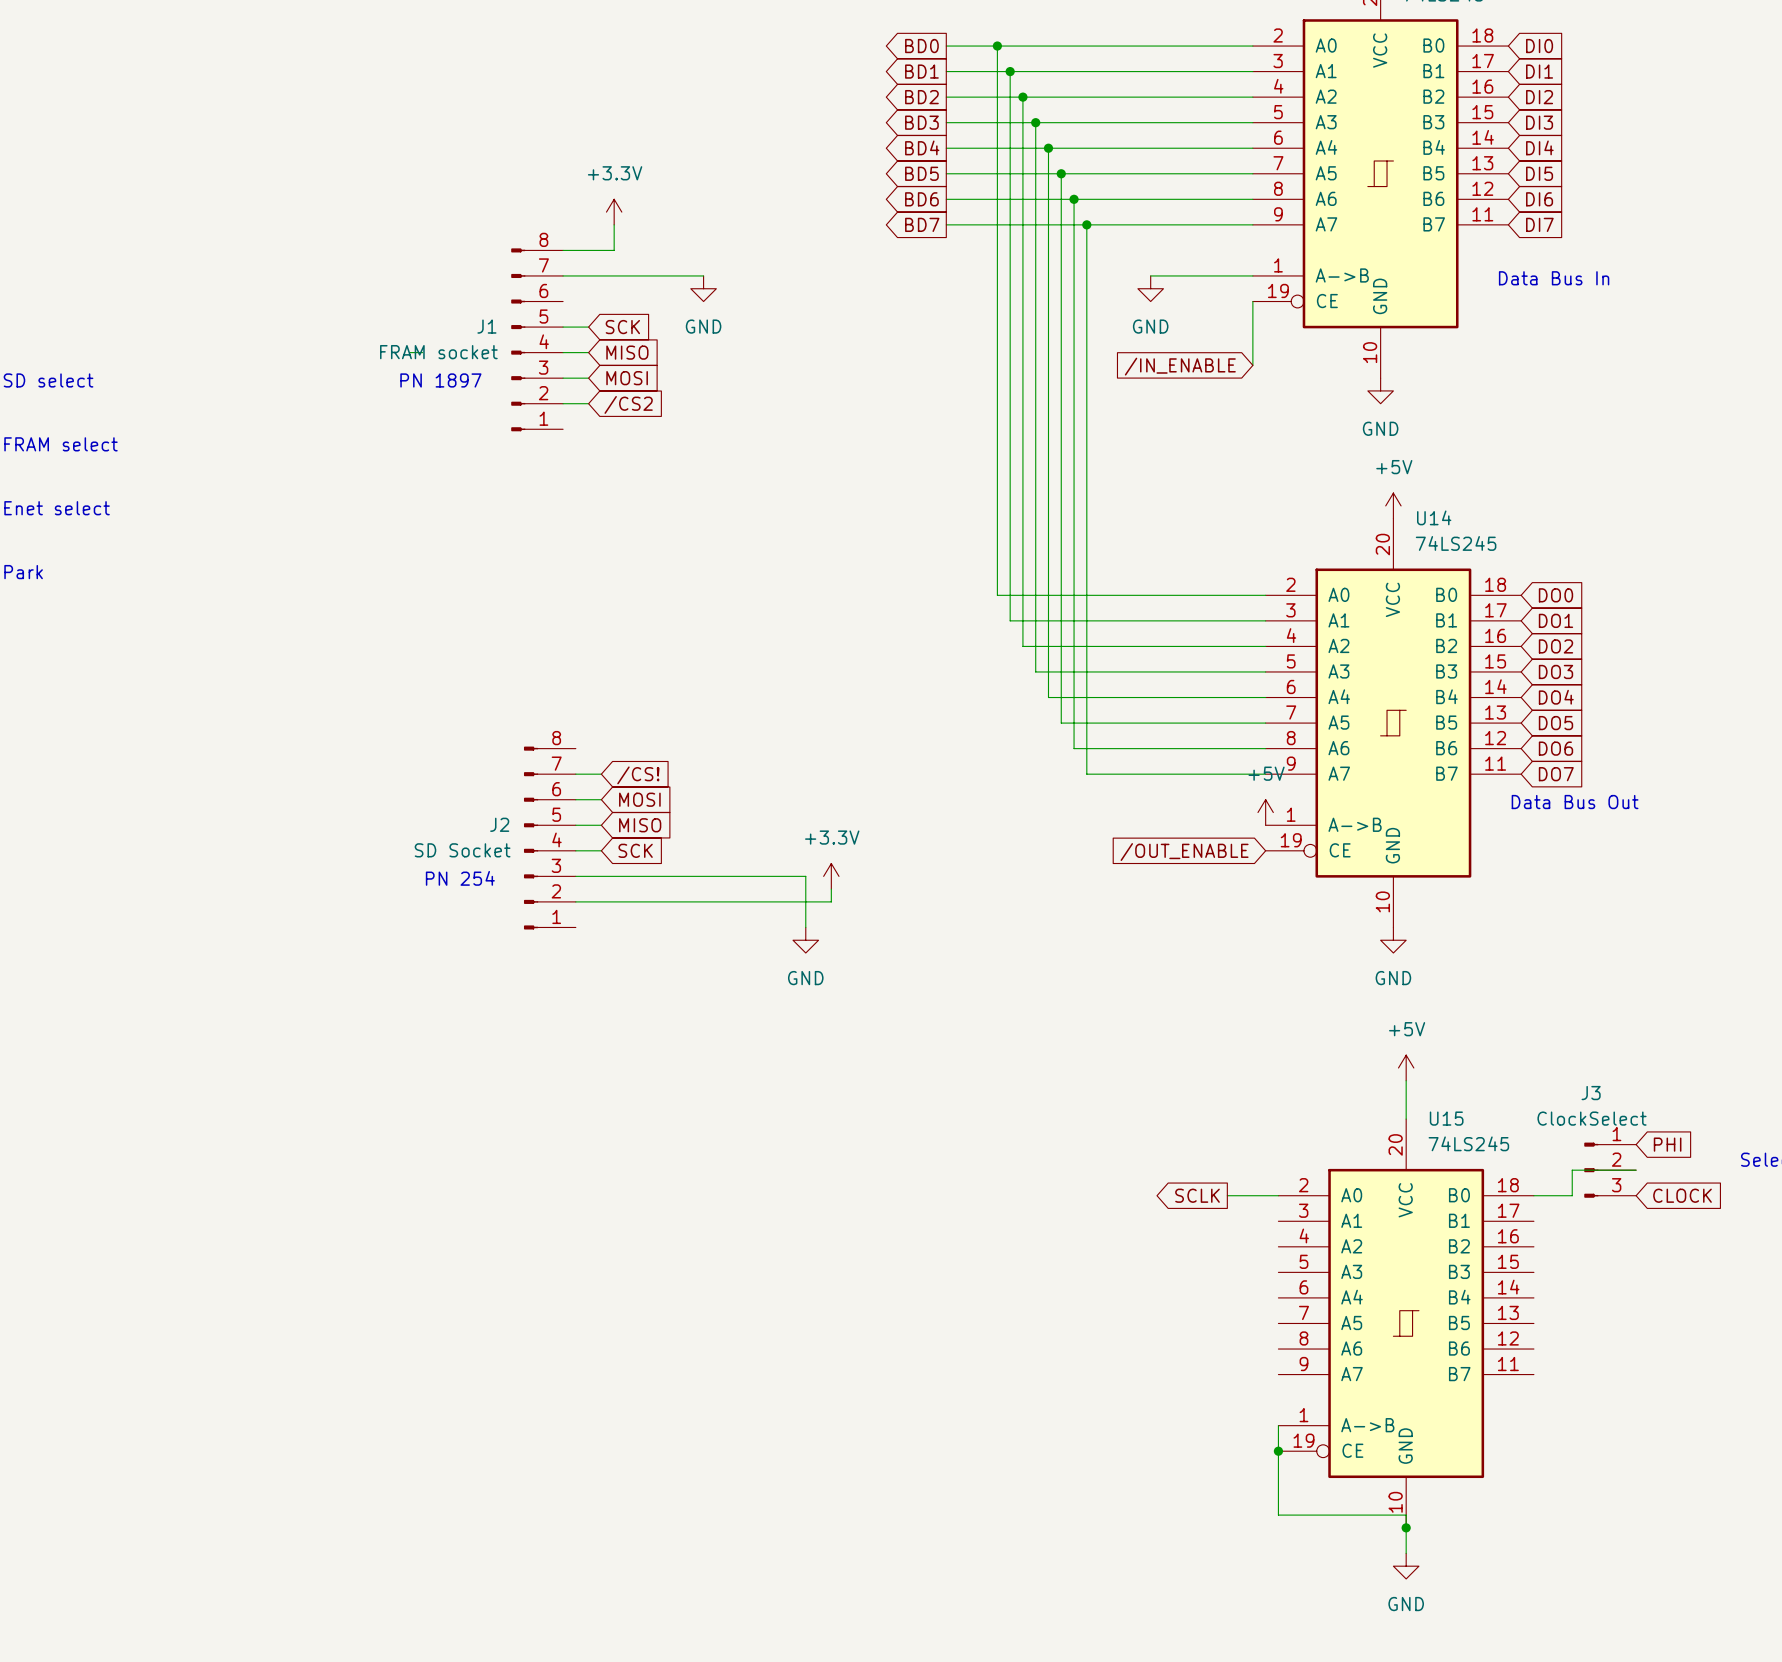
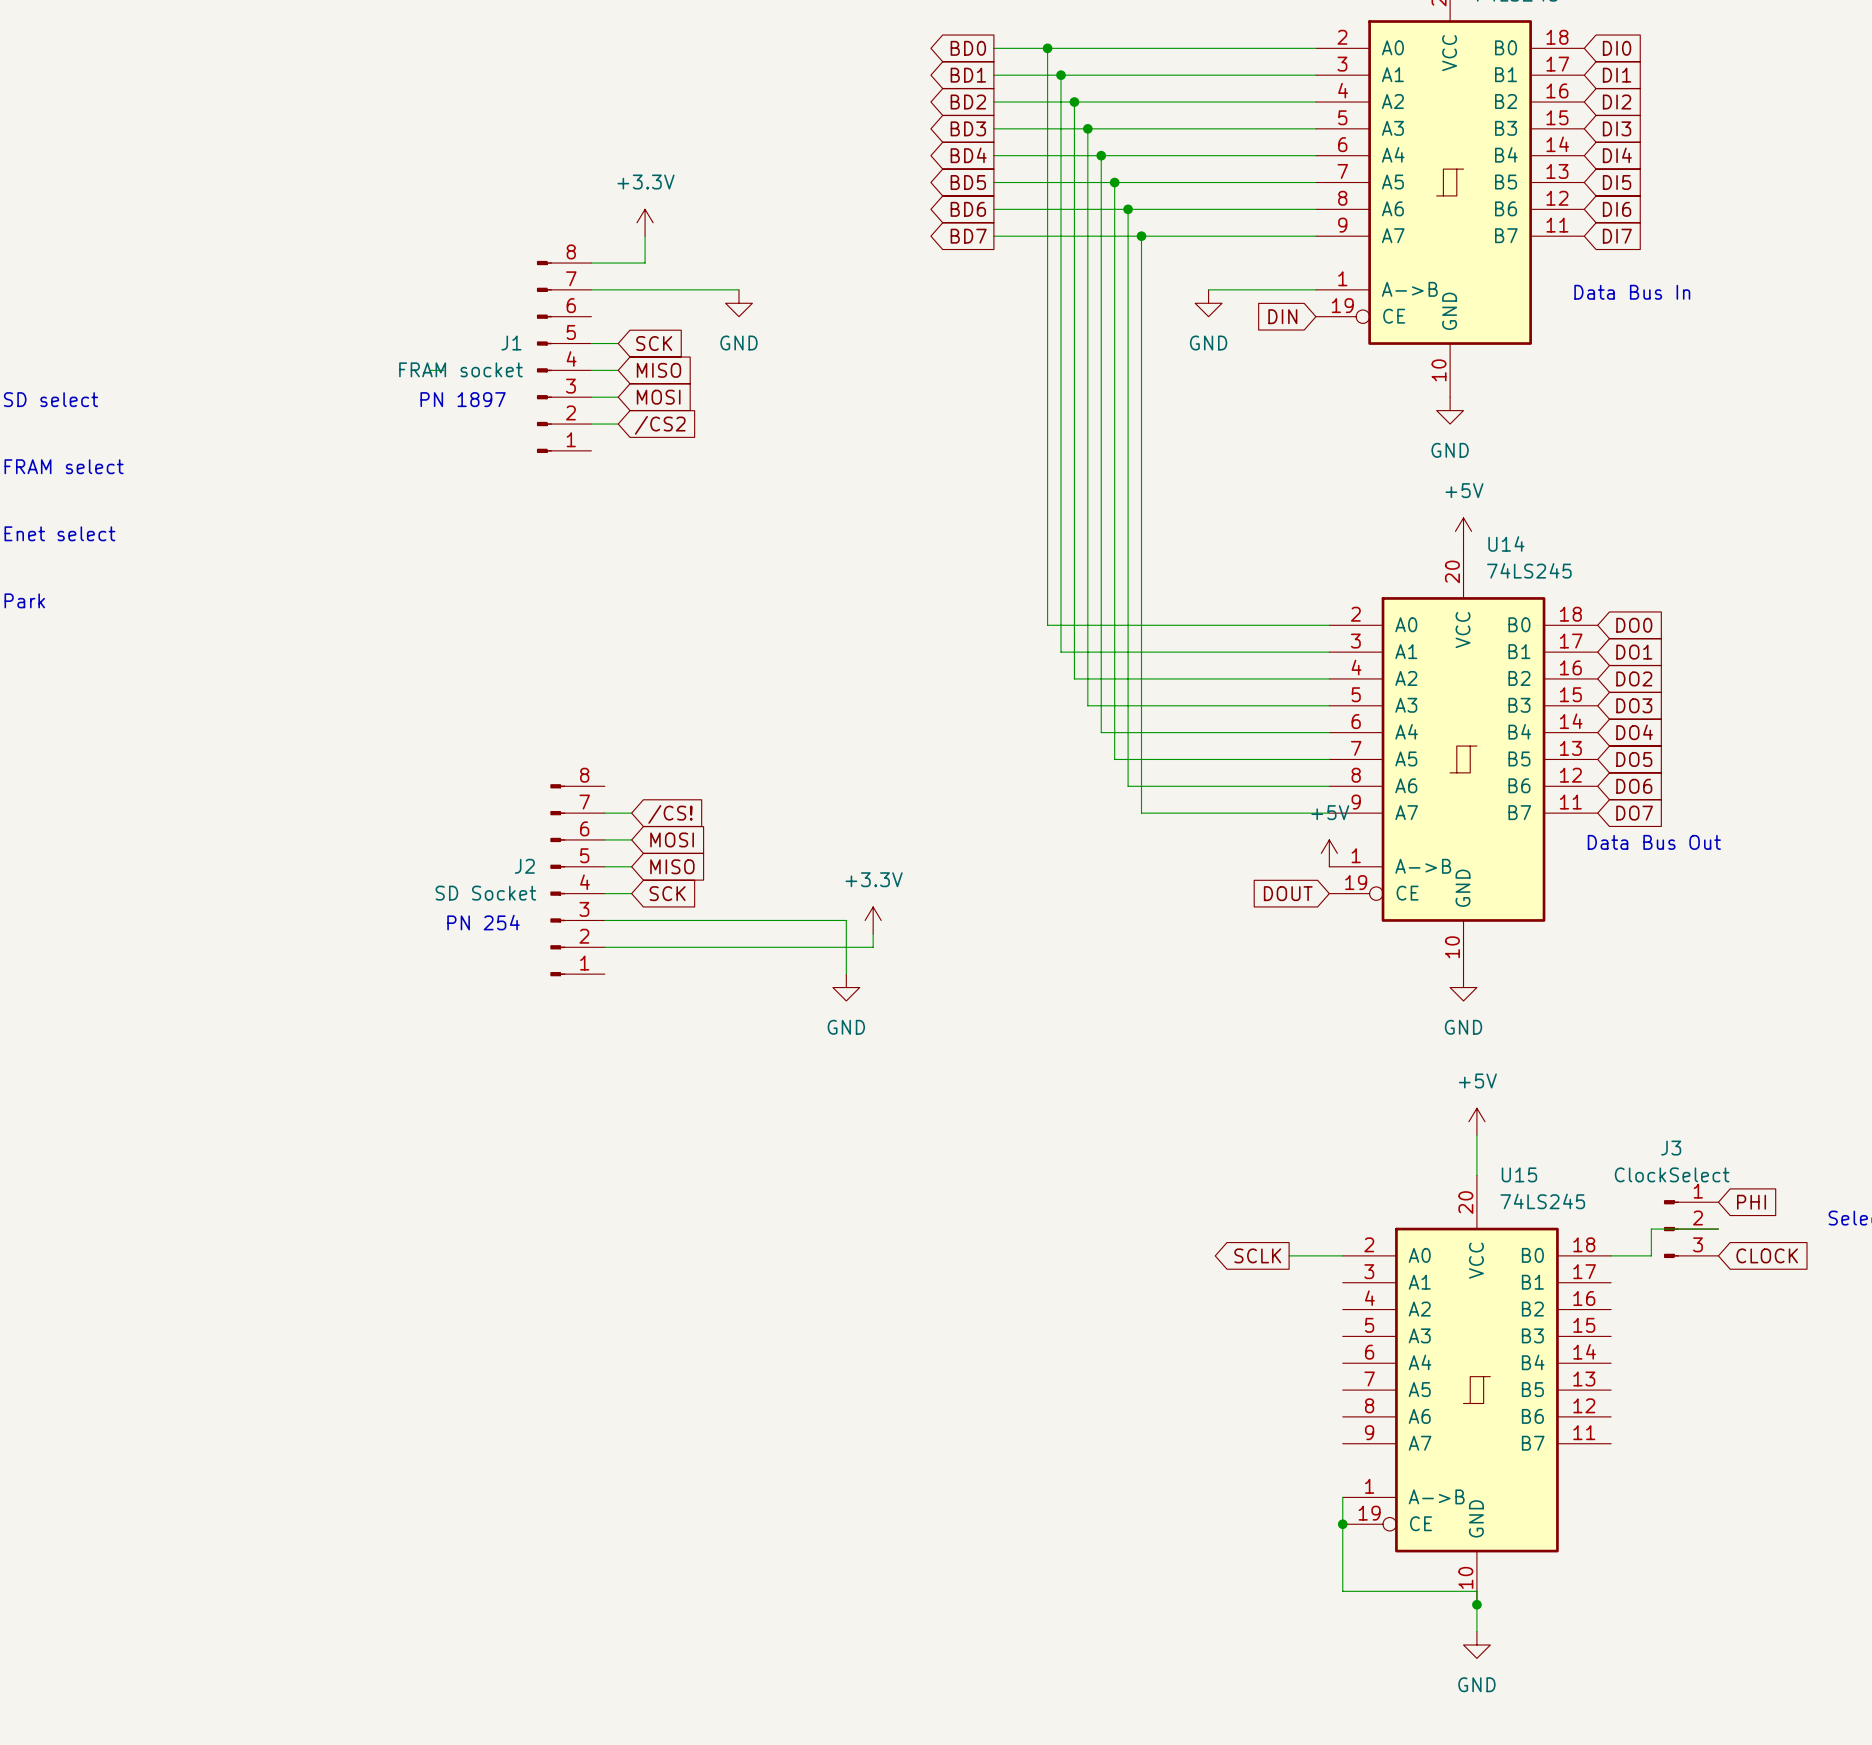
global label: none -> DIN (1282, 316)
wire: (1252, 301) (1252, 365) -> none
global label: /IN_ENABLE (1180, 366) -> none
global label: /OUT_ENABLE (1184, 852) -> DOUT (1288, 893)

